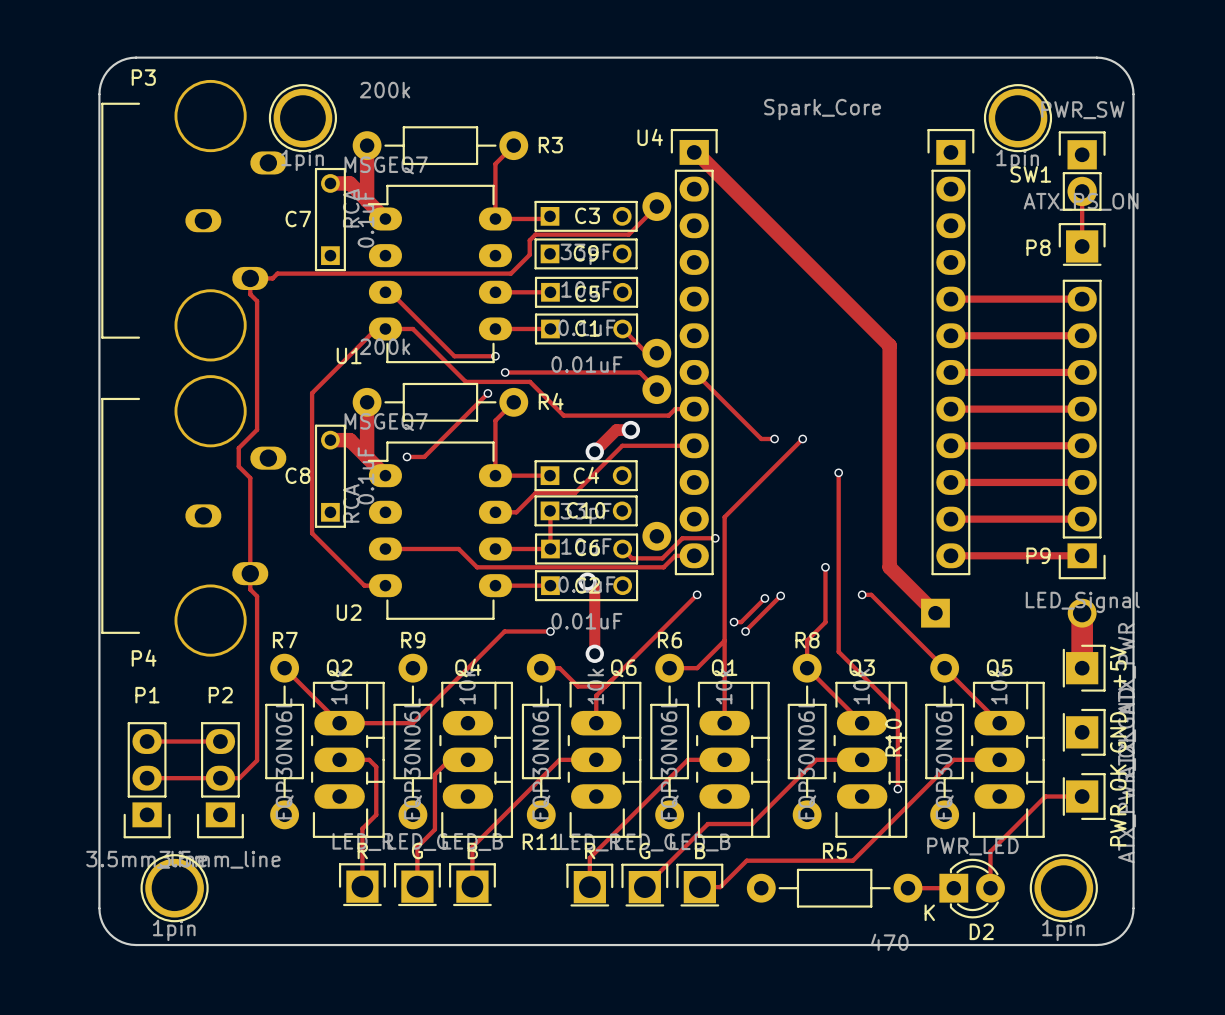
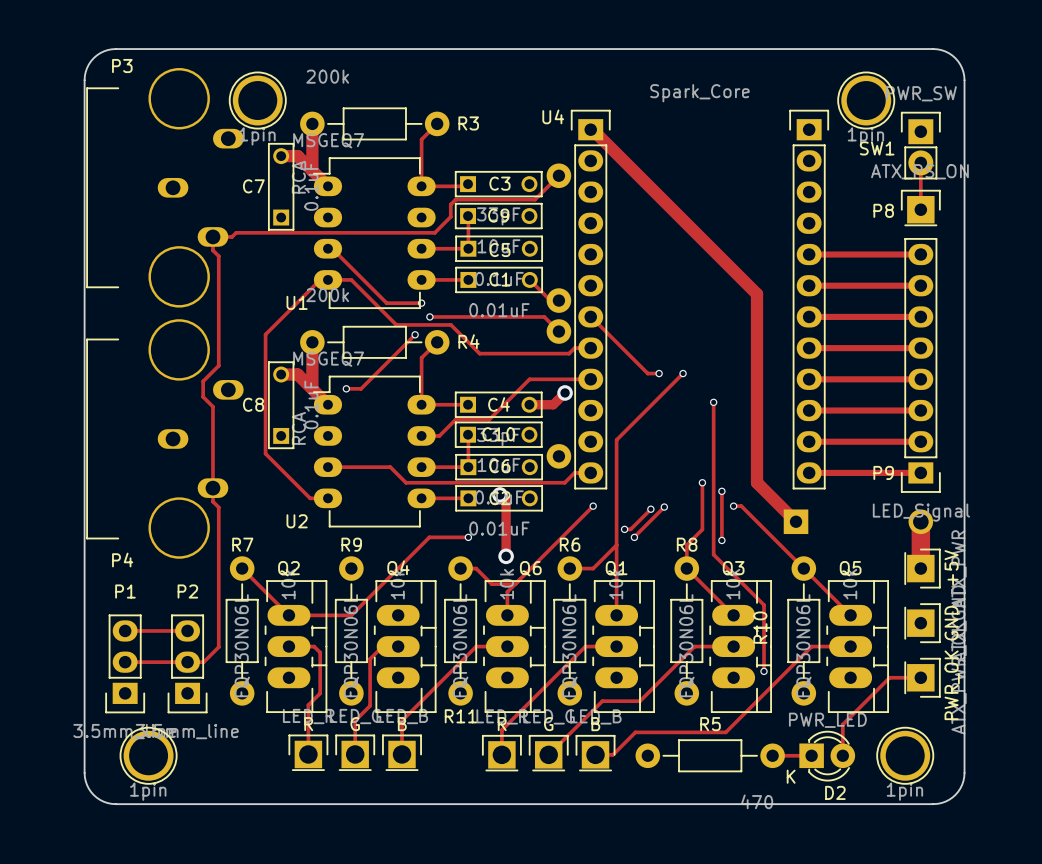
track: none -> (468, 216) (468, 248)
track: (630, 430) (616, 430) (594, 451) -> none
via: (630, 430) -> none
via: (594, 451) -> none
track: none -> (565, 392) (553, 404) (529, 404)
via: none -> (565, 392)
track: (715, 538) (682, 538) (662, 558) (632, 558) (622, 548) -> none
via: (715, 538) -> none
track: none -> (721, 491) (721, 540)
via: none -> (721, 491)
via: none -> (721, 540)

